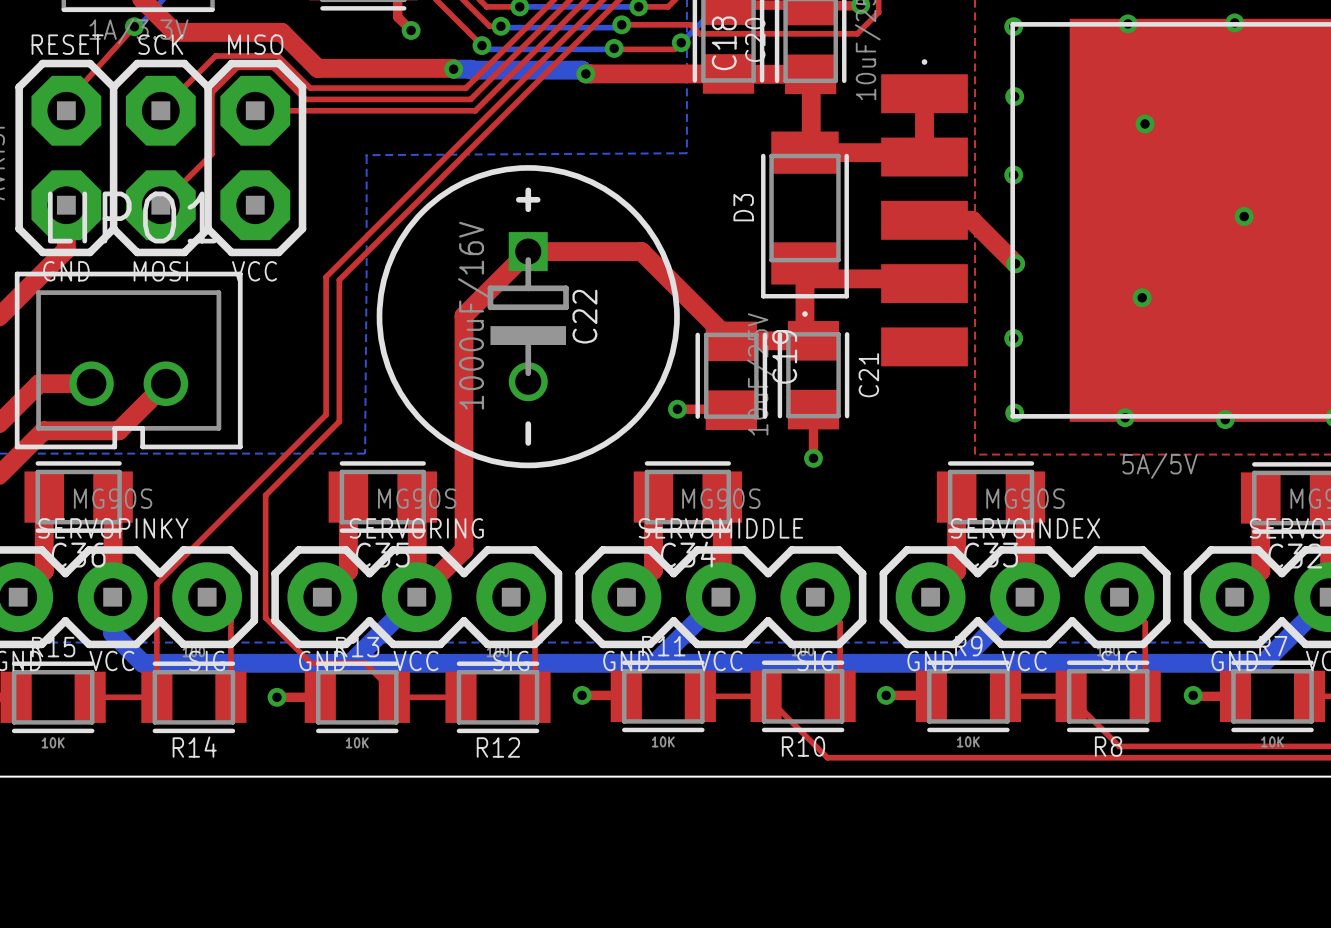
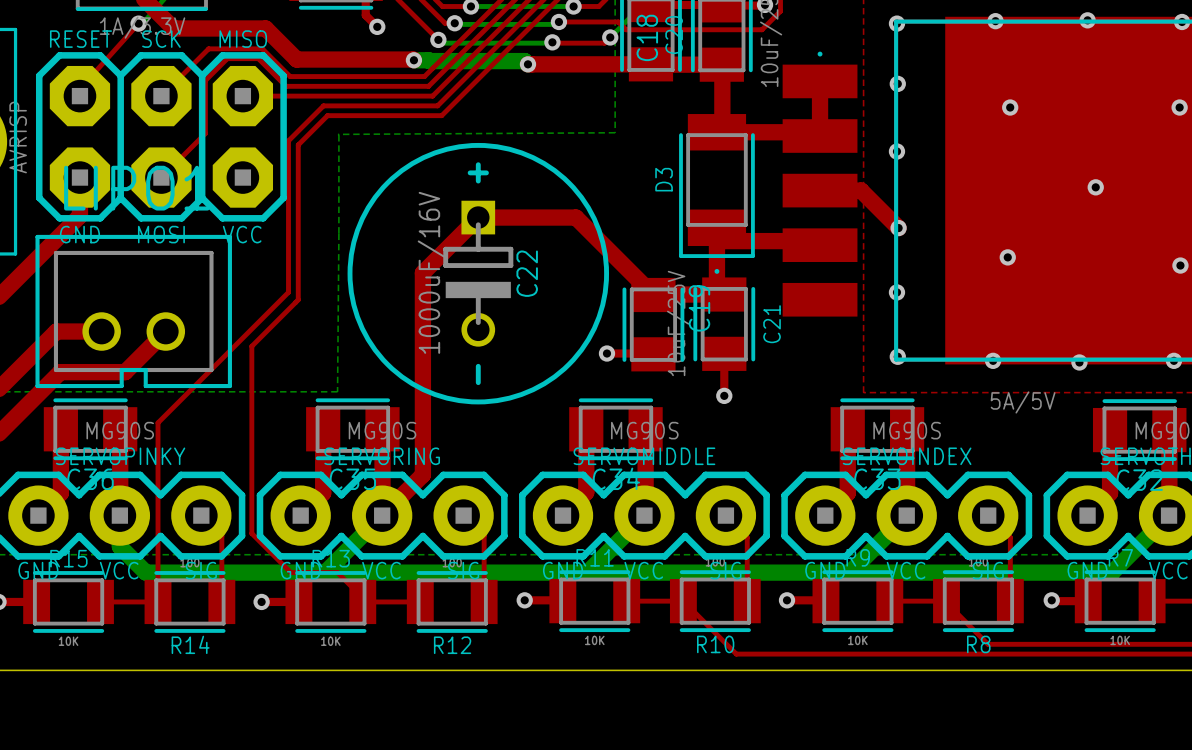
top track: (481, 122) (326, 277) (326, 414) (156, 584) -> (437, 105) (323, 105) (288, 140) (288, 292) (158, 422) (158, 504)
top track: (485, 133) (339, 279) (339, 421) (265, 495) -> (441, 115) (327, 115) (298, 144) (298, 299) (251, 346) (251, 427)

